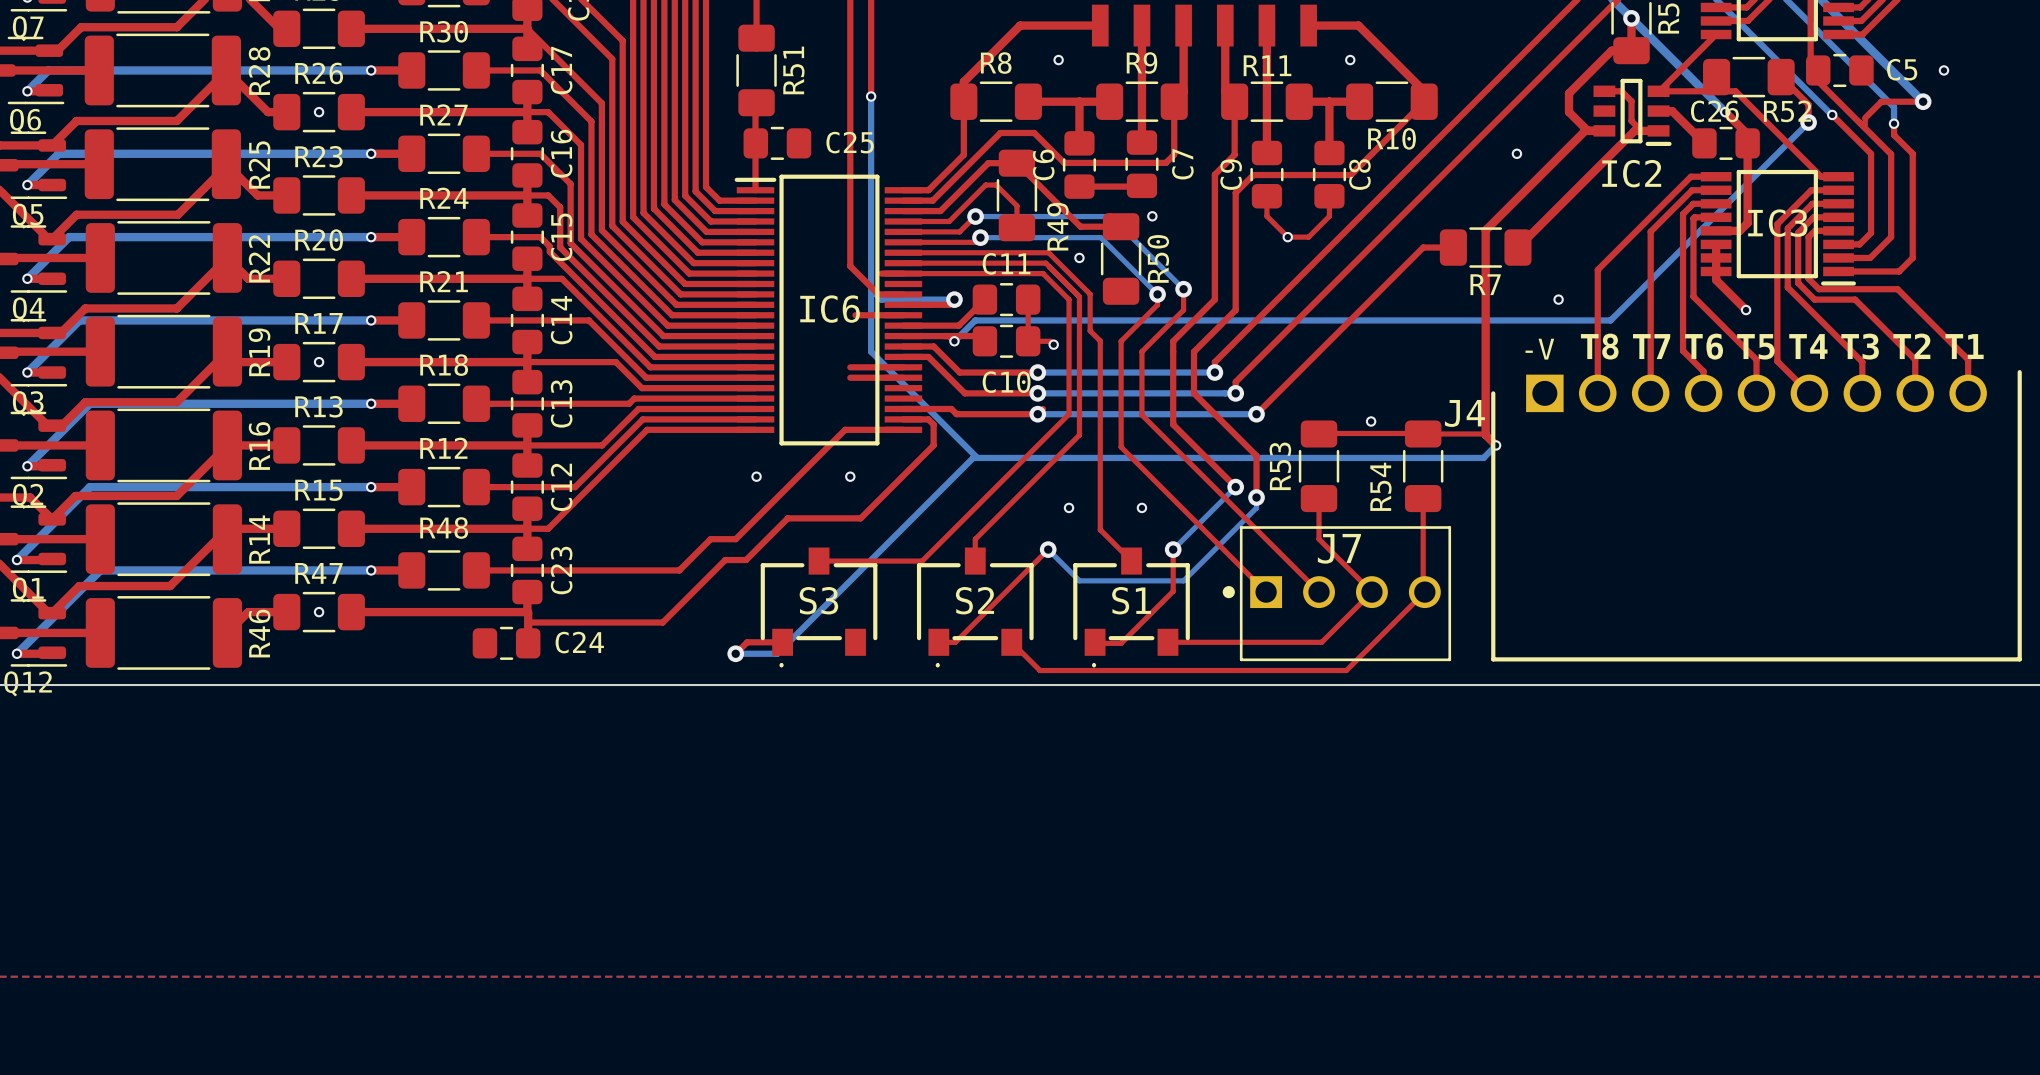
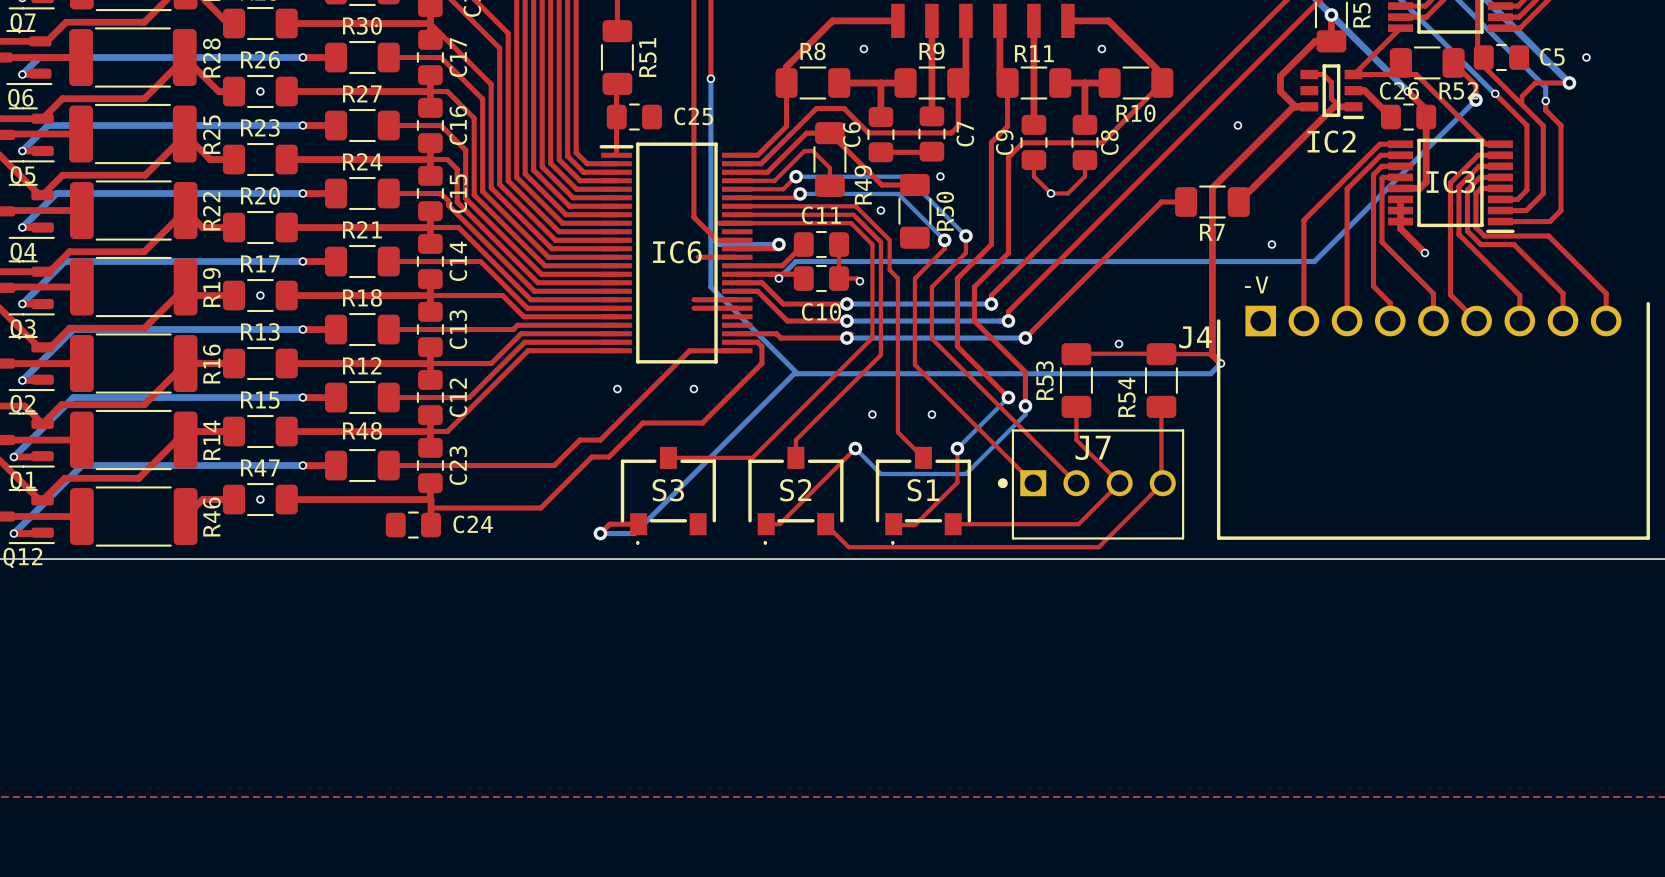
text: T8 (1599, 346) -> none
text: T7 (1651, 346) -> none
text: T6 (1704, 346) -> none
text: T5 (1755, 346) -> none
text: T4 (1808, 346) -> none
text: T3 (1860, 346) -> none
text: T2 (1911, 346) -> none
text: T1 (1964, 346) -> none

